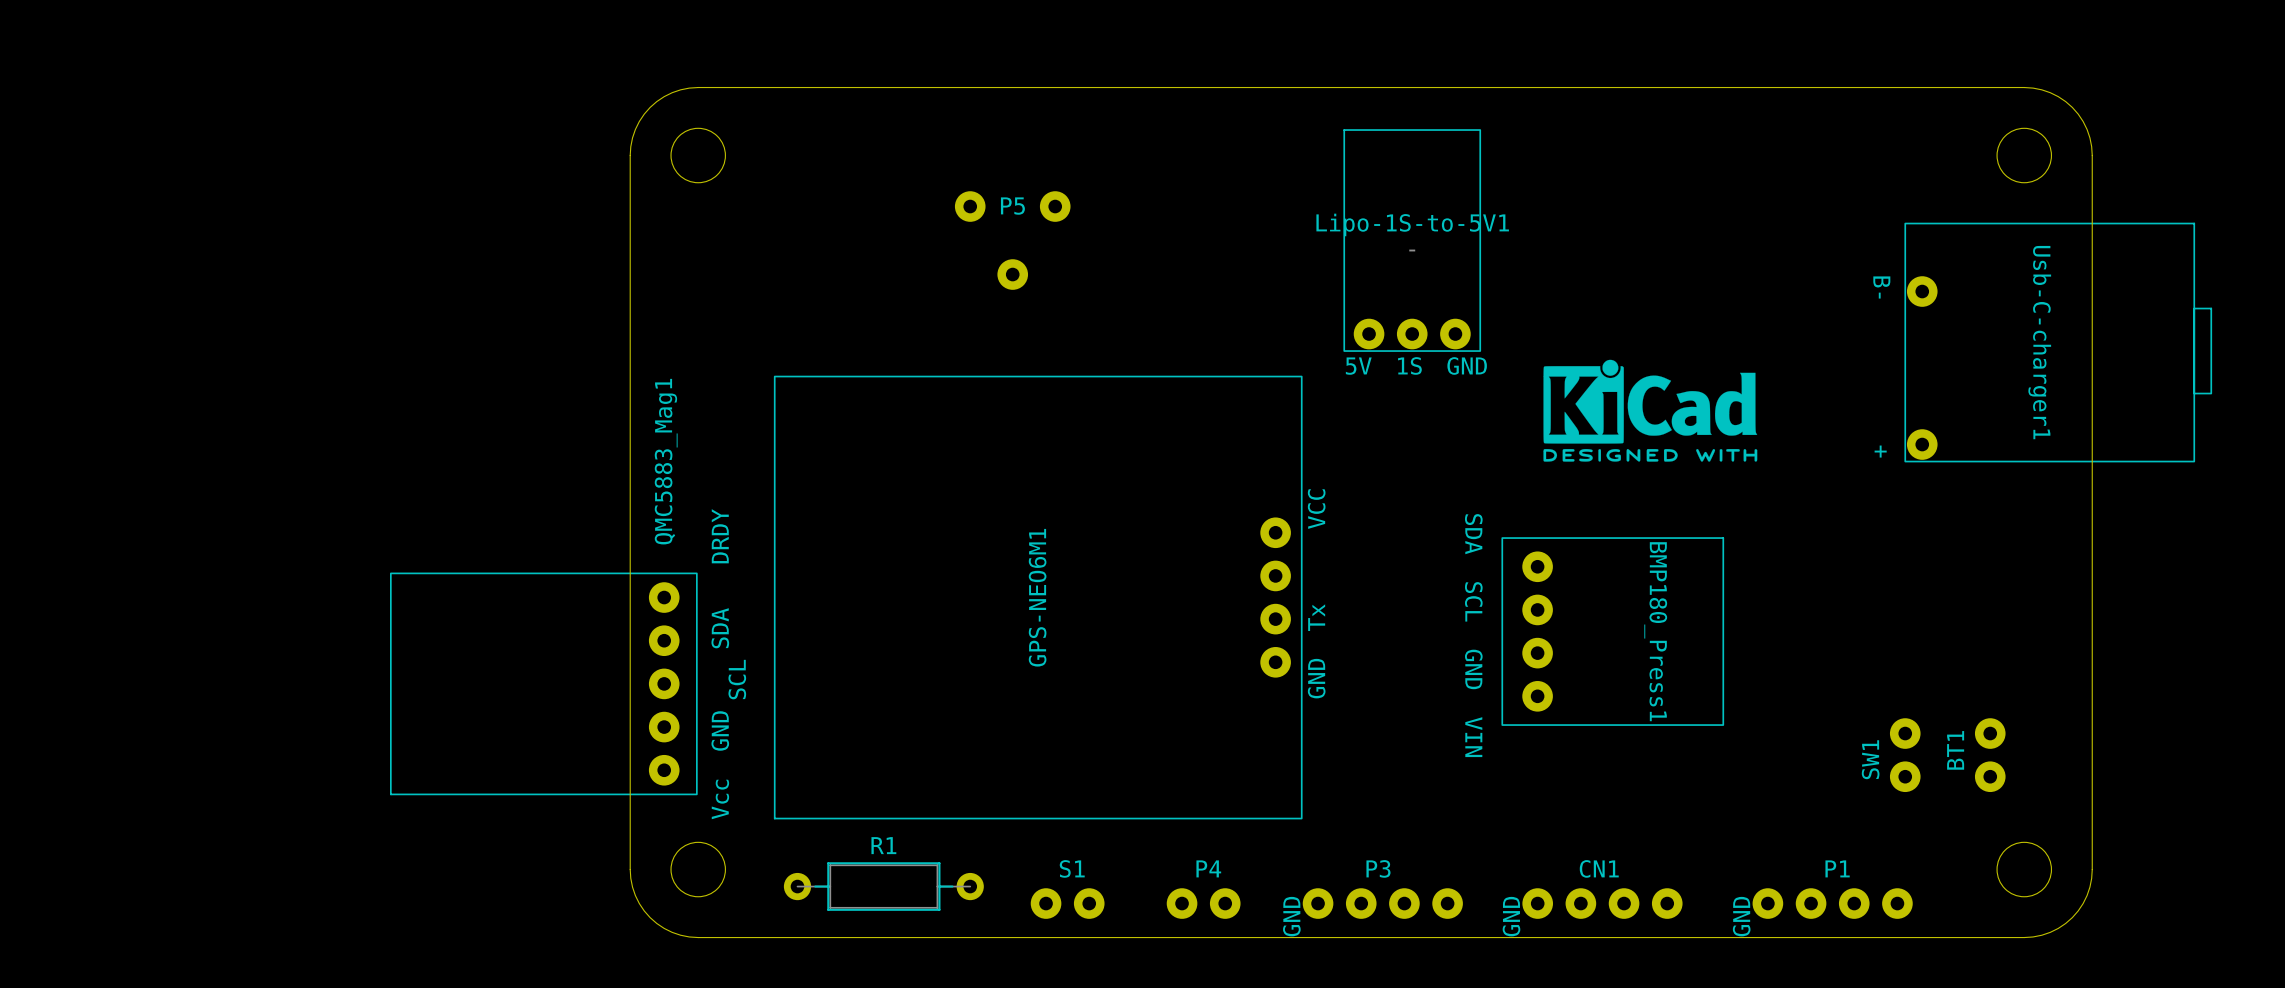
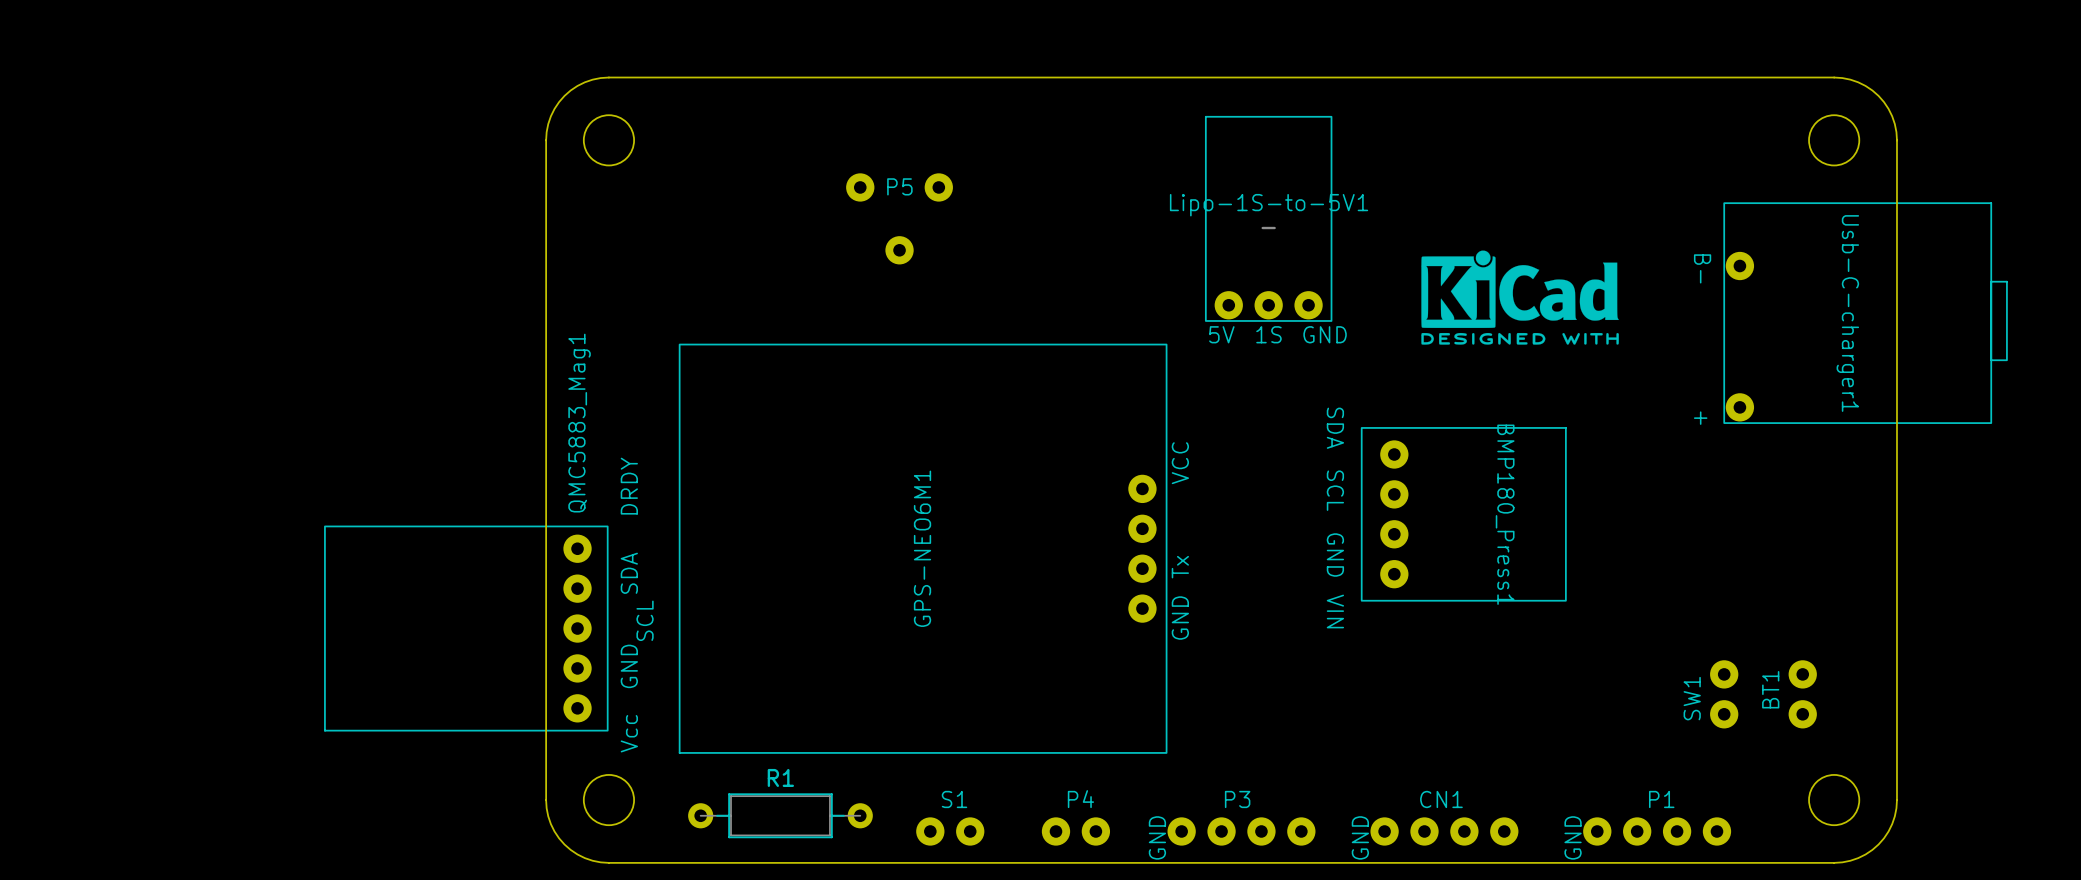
drawing position: (1650, 410) -> (1520, 297)
BMP180_Press1 position: (1612, 631) -> (1463, 514)

